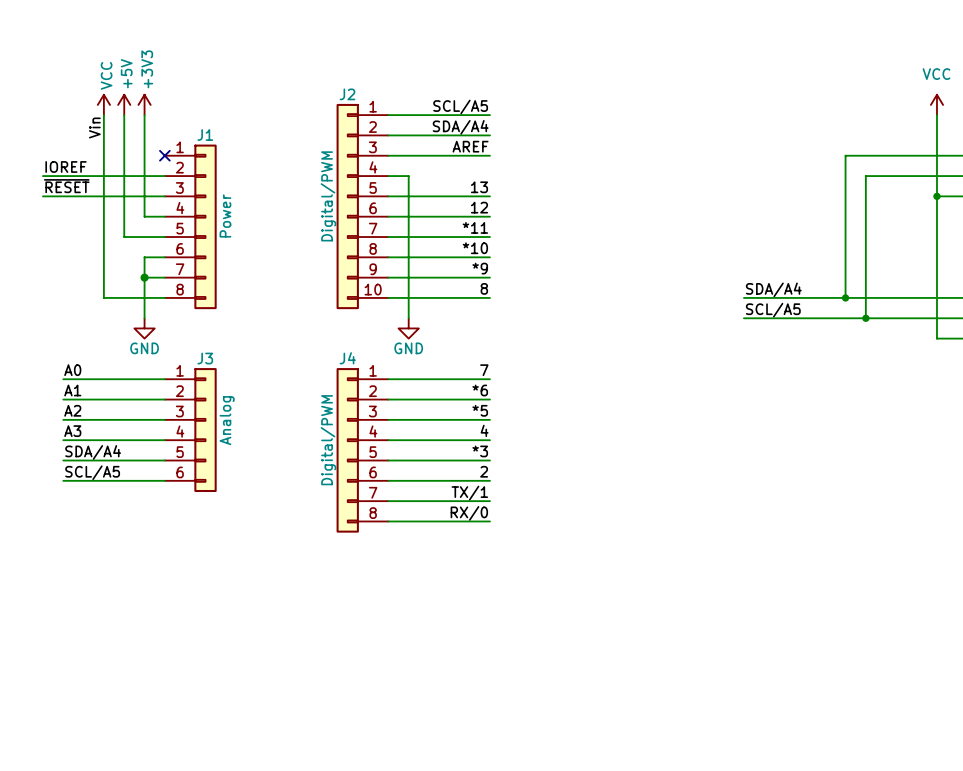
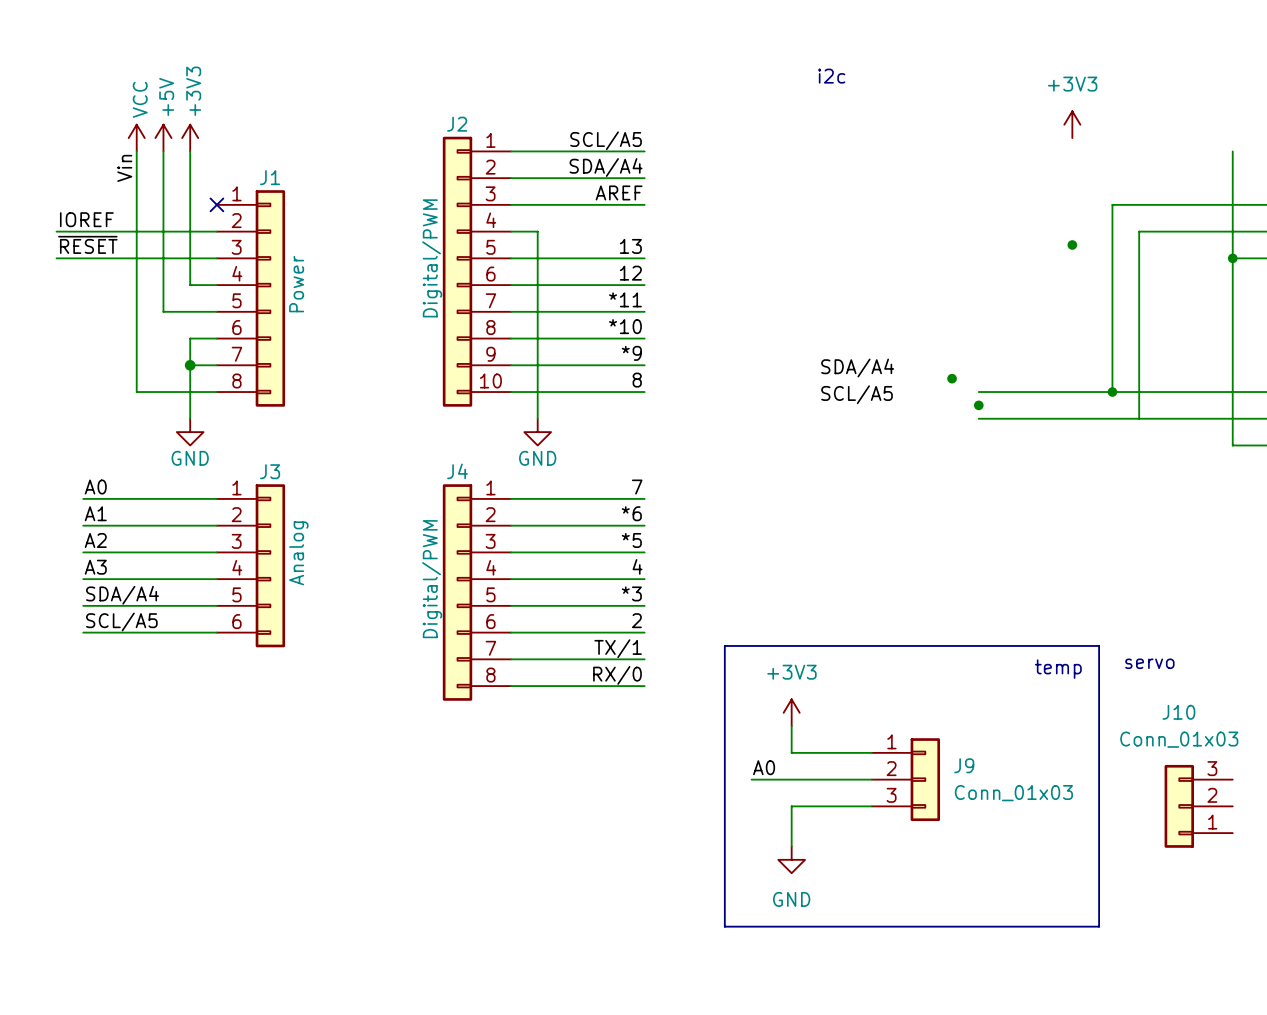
text: none -> i2c (831, 76)
power symbol: none -> +3V3 (1072, 124)
power symbol: VCC (936, 104) -> none
junction: none -> (1072, 244)
junction: none -> (952, 378)
label position: SDA/A4 (773, 289) -> SDA/A4 (857, 367)
junction: none -> (978, 405)
label position: SCL/A5 (773, 310) -> SCL/A5 (857, 394)
junction: (865, 318) -> none
line: none -> (724, 645) (1099, 645) (1099, 926) (724, 926) (724, 645)
text: none -> servo (1149, 663)
text: none -> temp (1058, 669)
power symbol: none -> +3V3 (791, 712)
wire: none -> (791, 726) (791, 752) (871, 752)
label: none -> A0 (764, 767)
wire: none -> (751, 779) (871, 779)
J9: none -> Conn_01x03 (905, 779)
wire: none -> (871, 806) (791, 806) (791, 846)
J10: none -> Conn_01x03 (1198, 806)
power symbol: none -> GND (791, 859)

